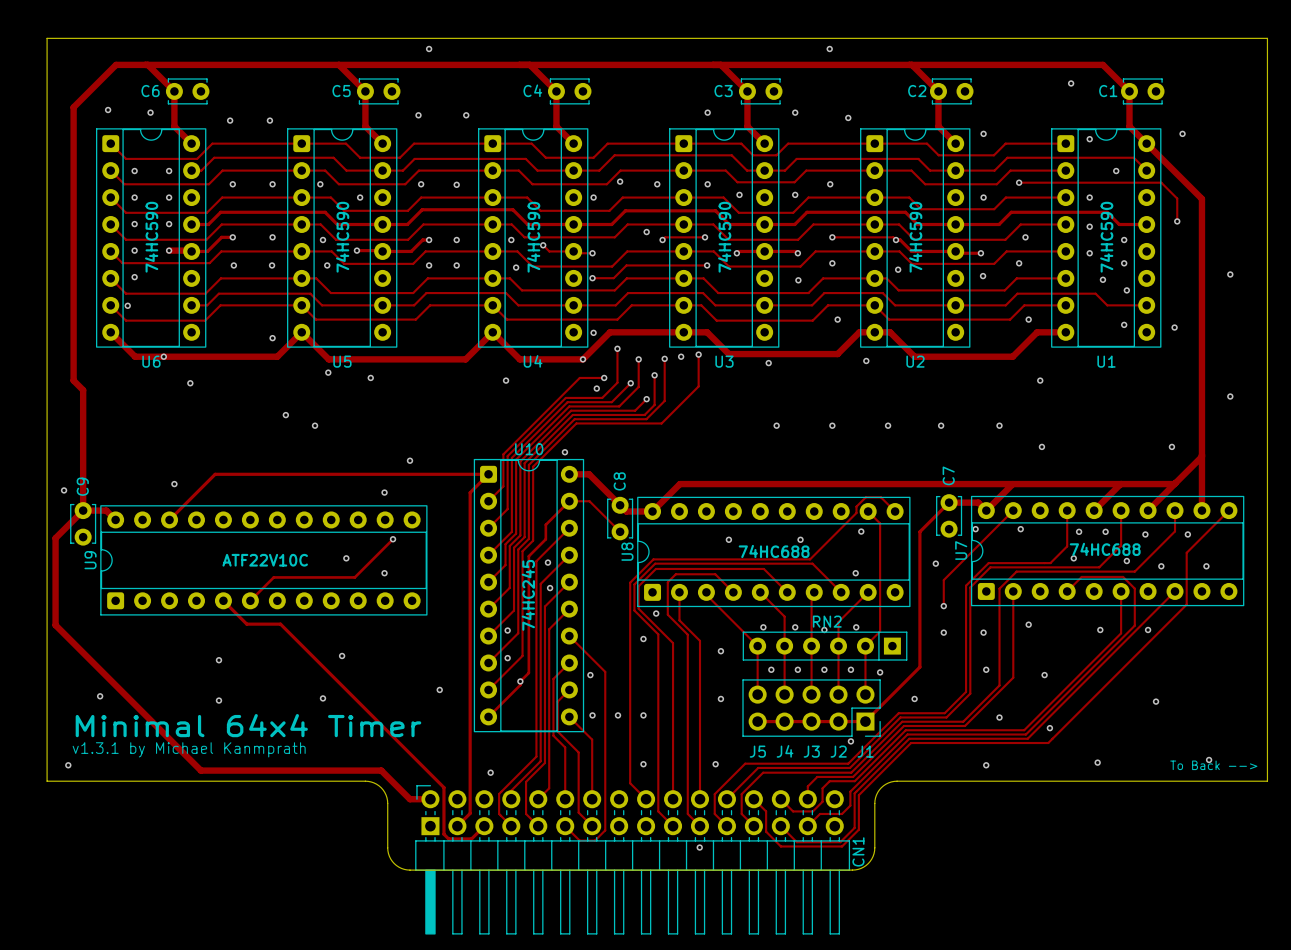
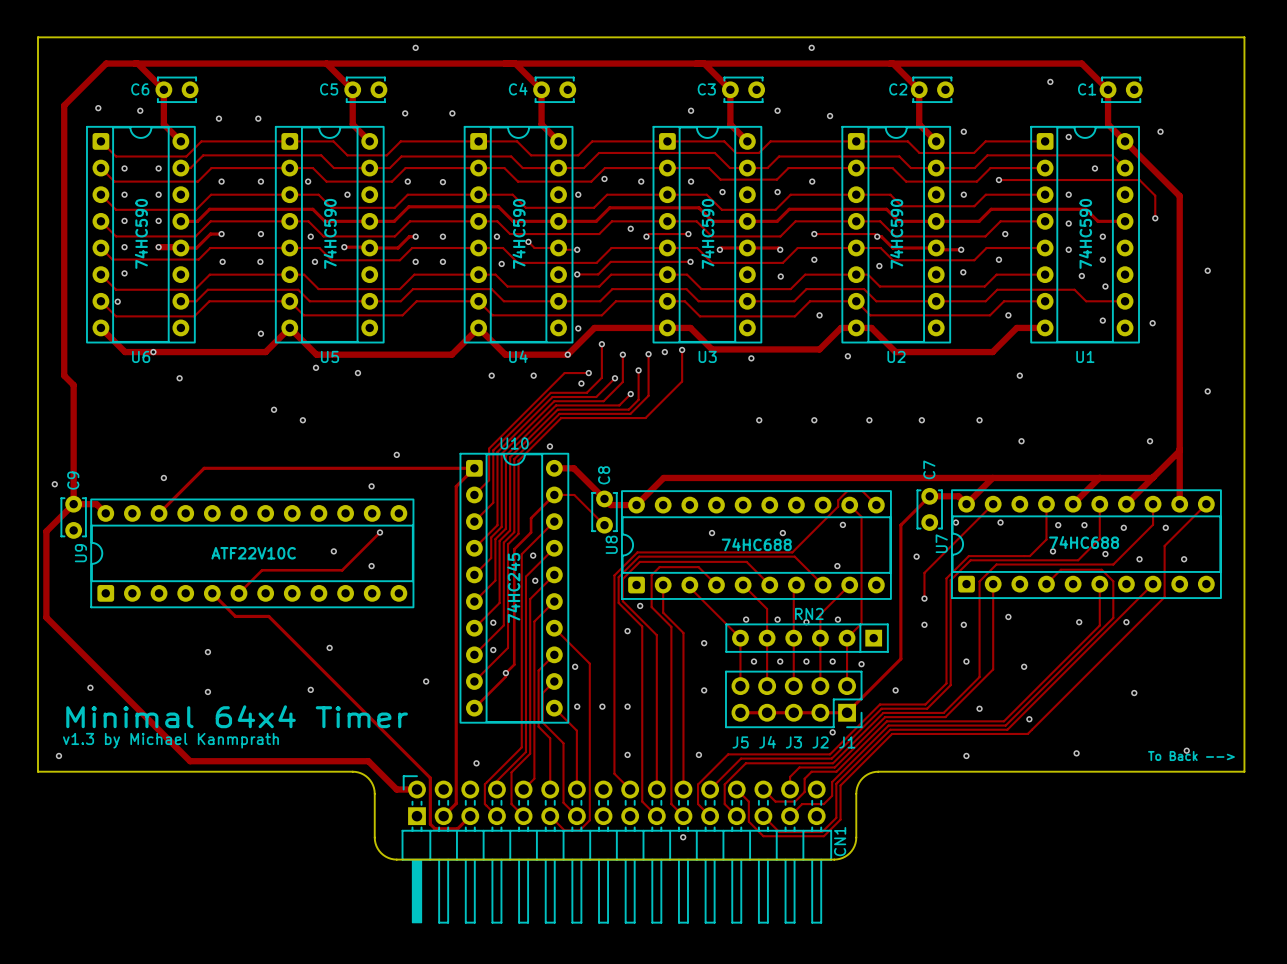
via: none -> (533, 375)
text: v1.3.1 by Michael Kanmprath (189, 749) -> v1.3 by Michael Kanmprath (170, 740)

